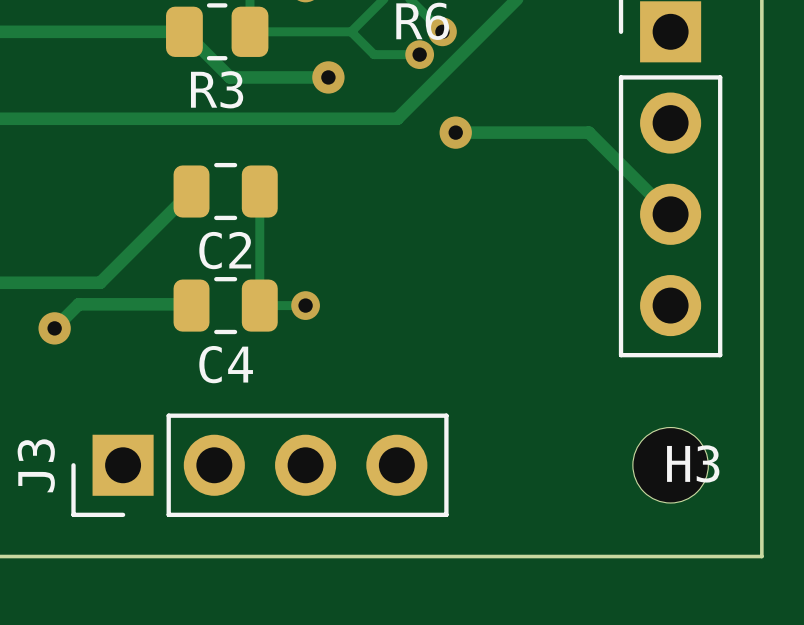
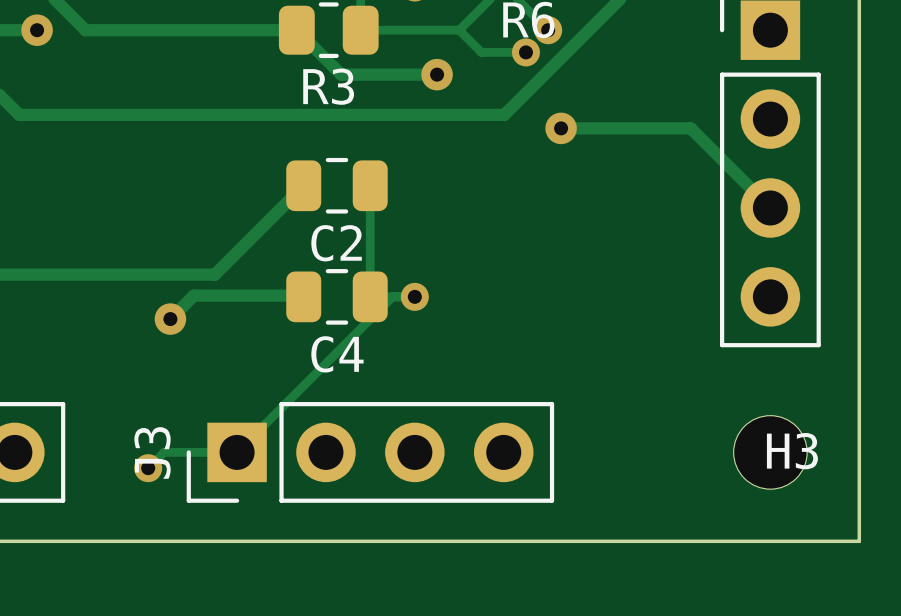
track: none -> (392, 296) (237, 452) (163, 452) (148, 468)
via: none -> (148, 468)

